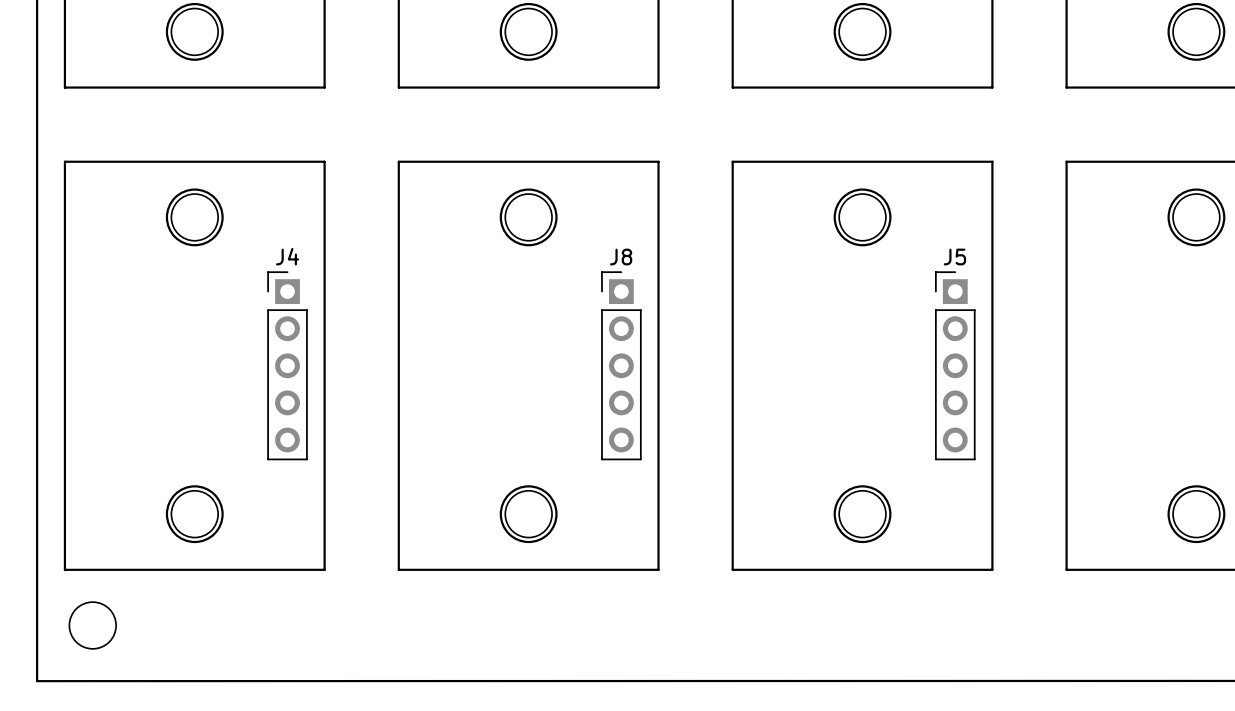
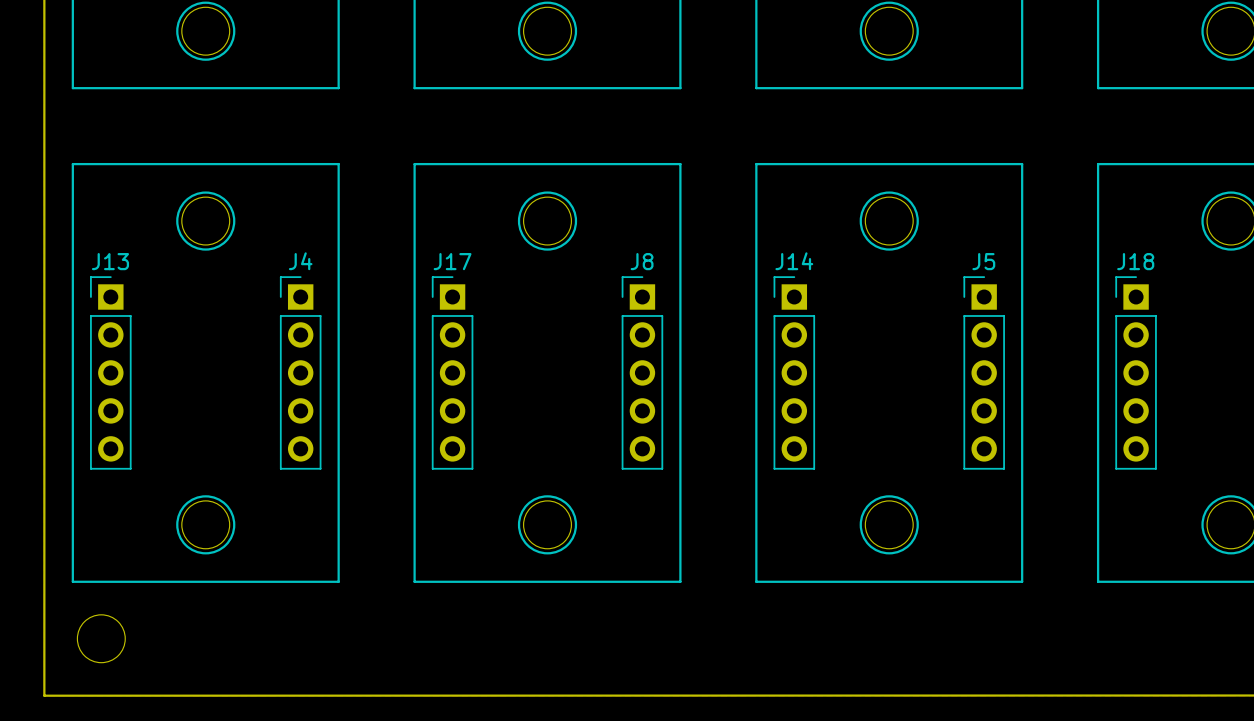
J13: none -> (110, 372)
J17: none -> (452, 372)
J14: none -> (794, 372)
J18: none -> (1136, 372)

